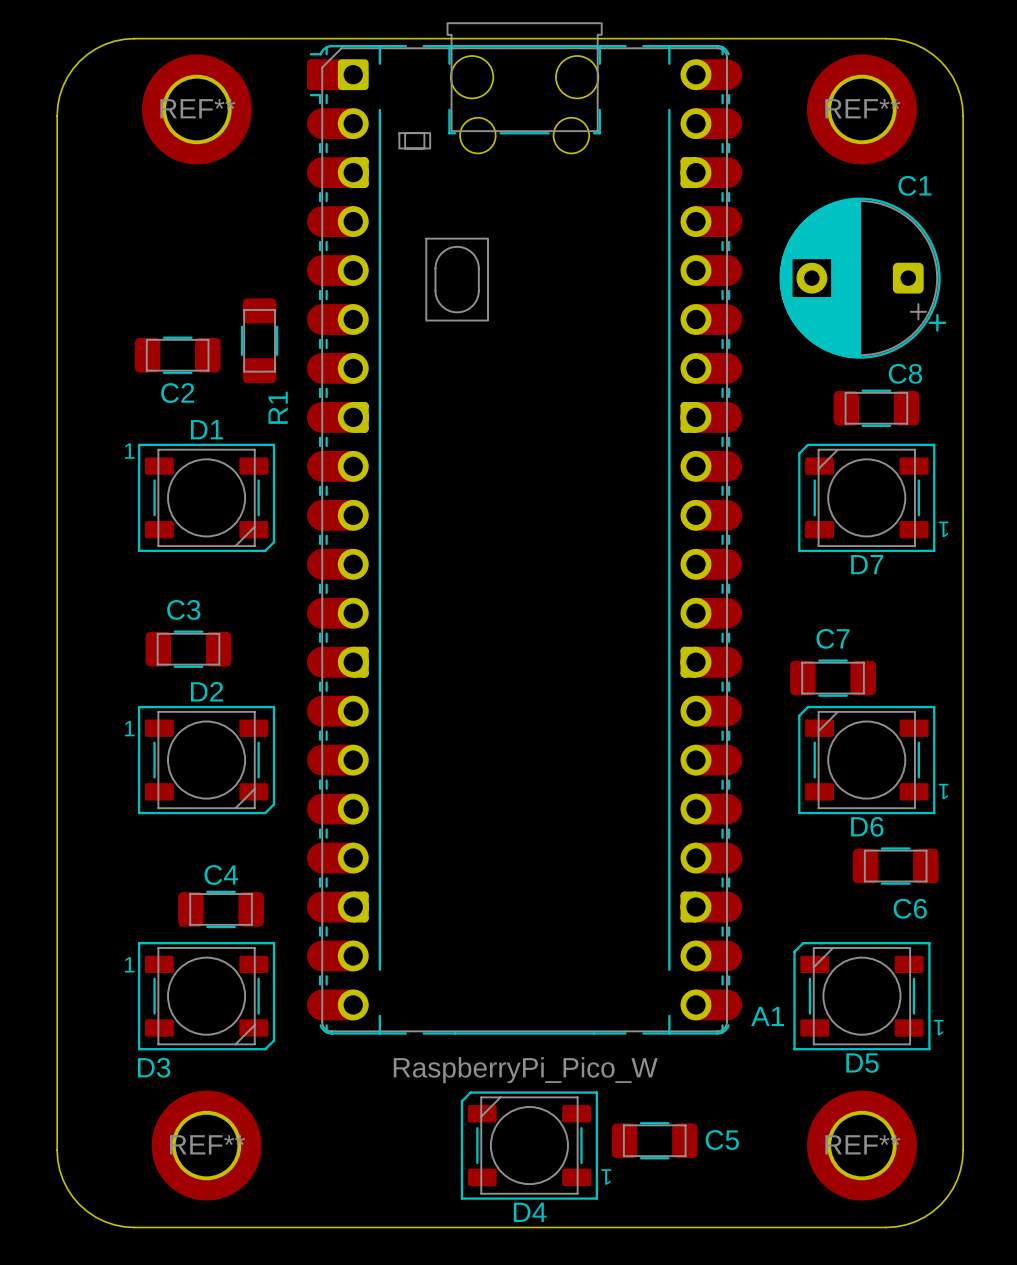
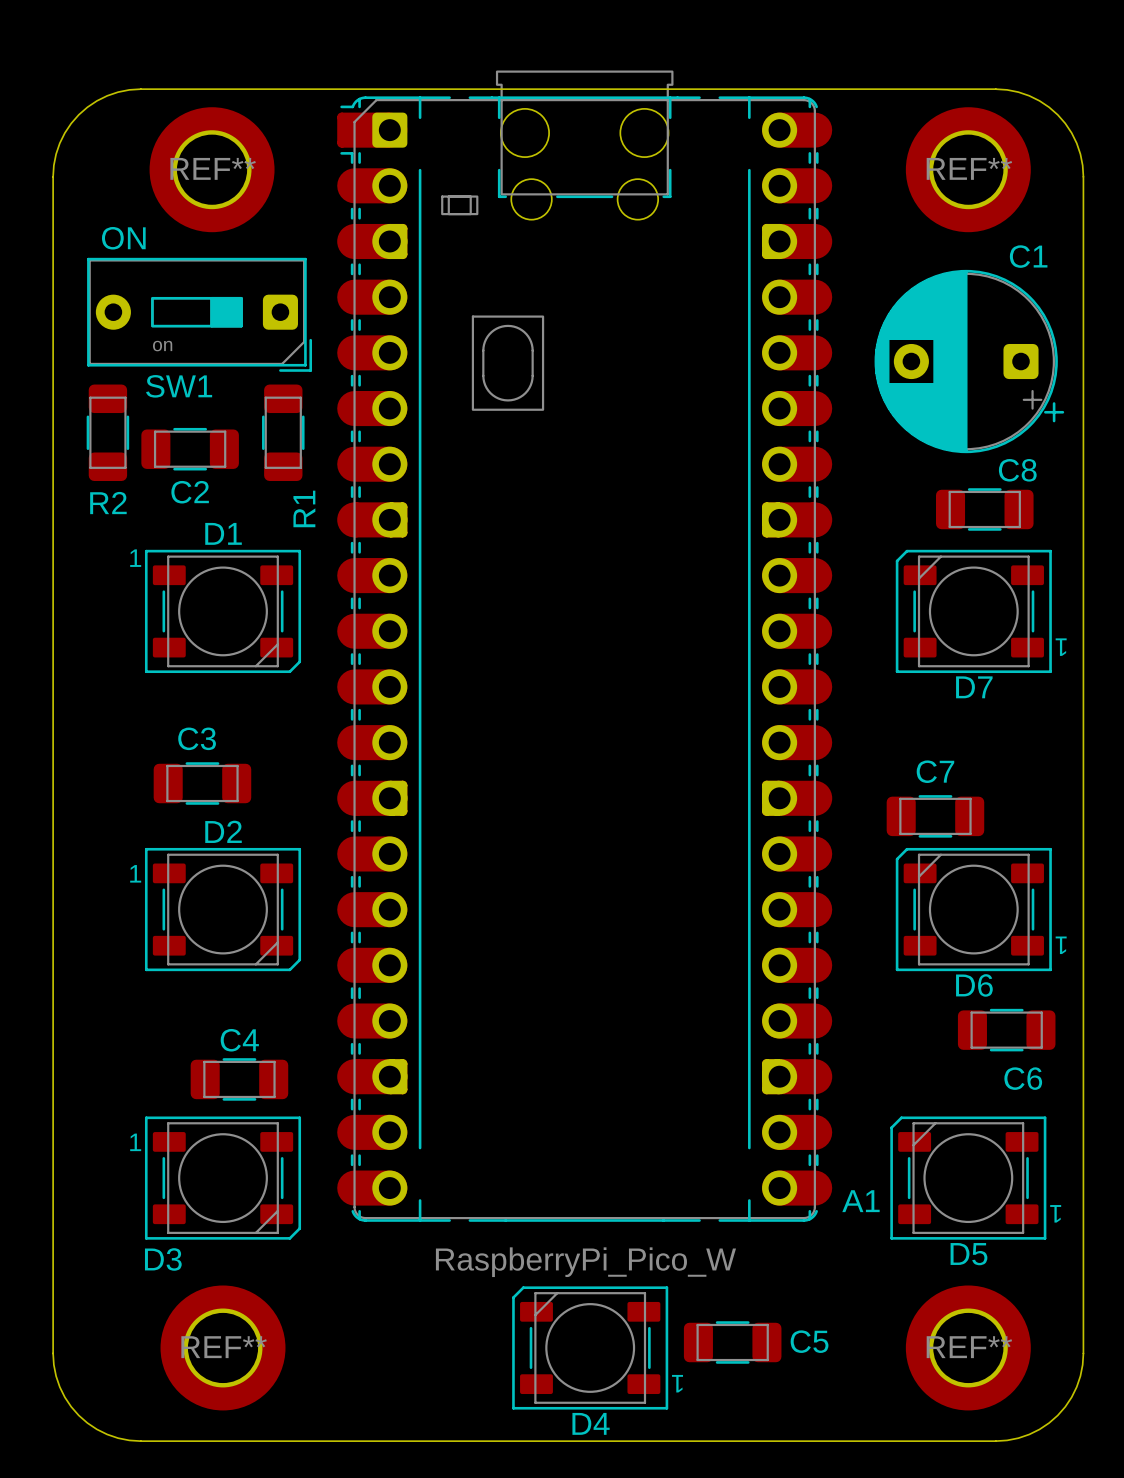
text: none -> ON (123, 238)
SW1: none -> (199, 314)
R2: none -> (107, 432)

